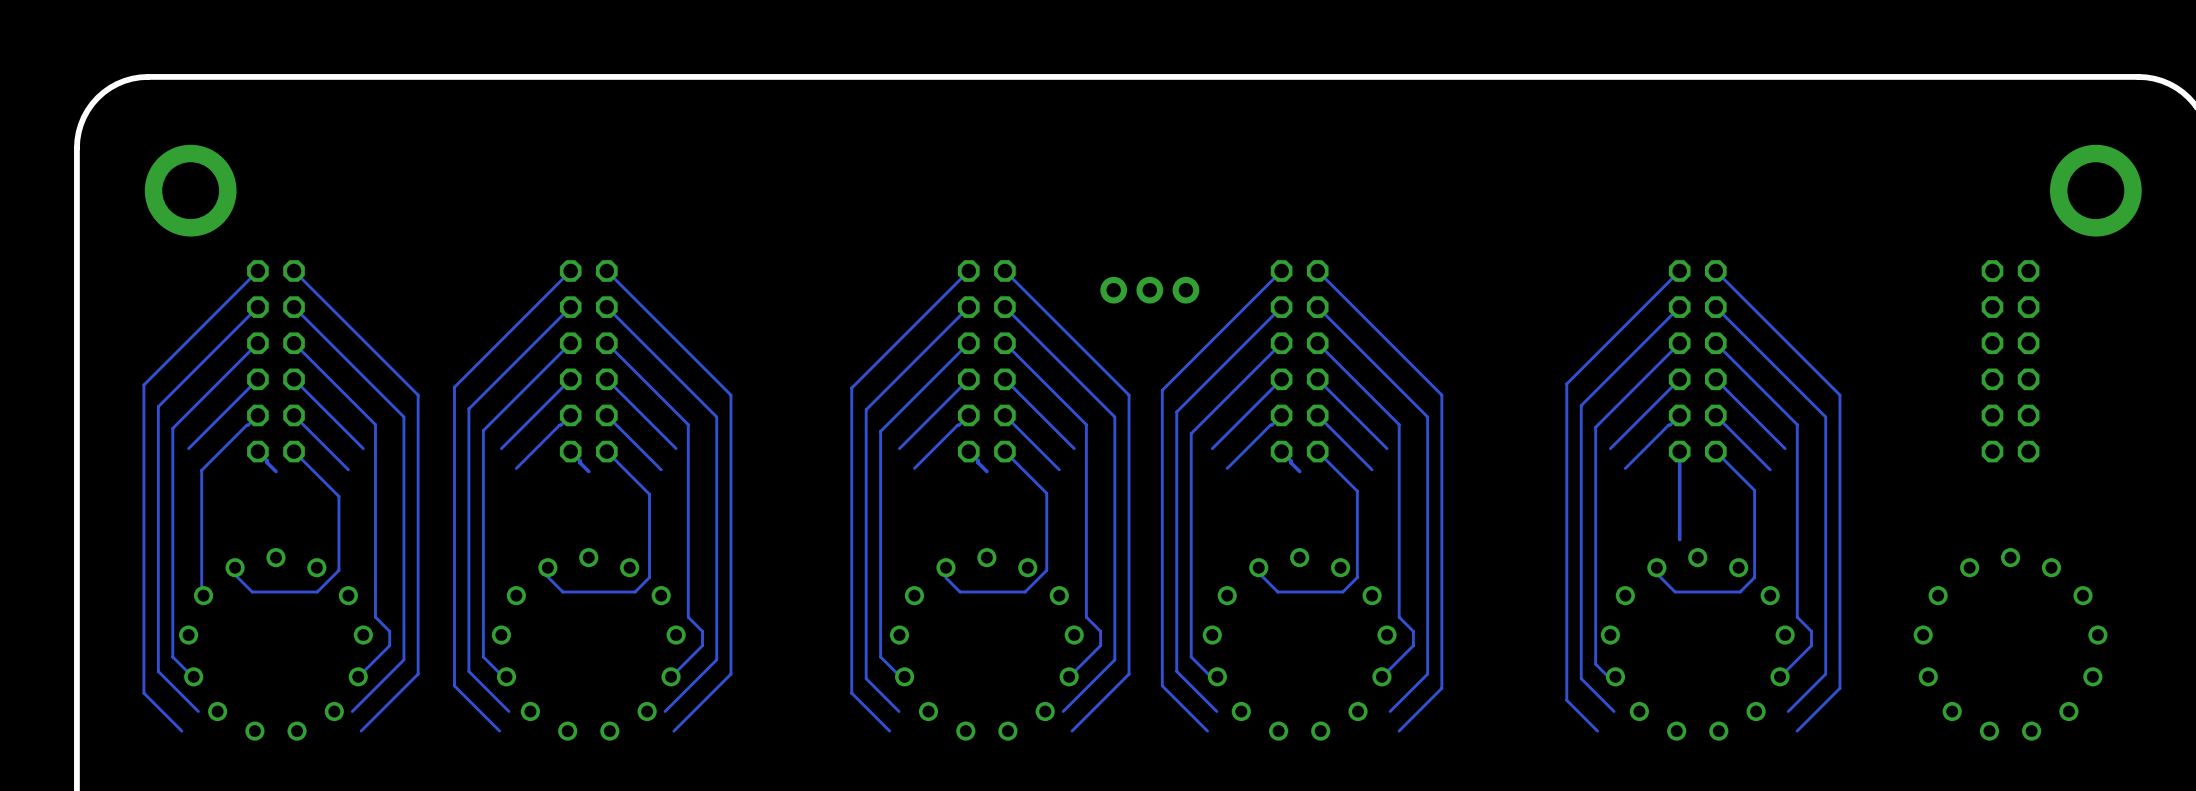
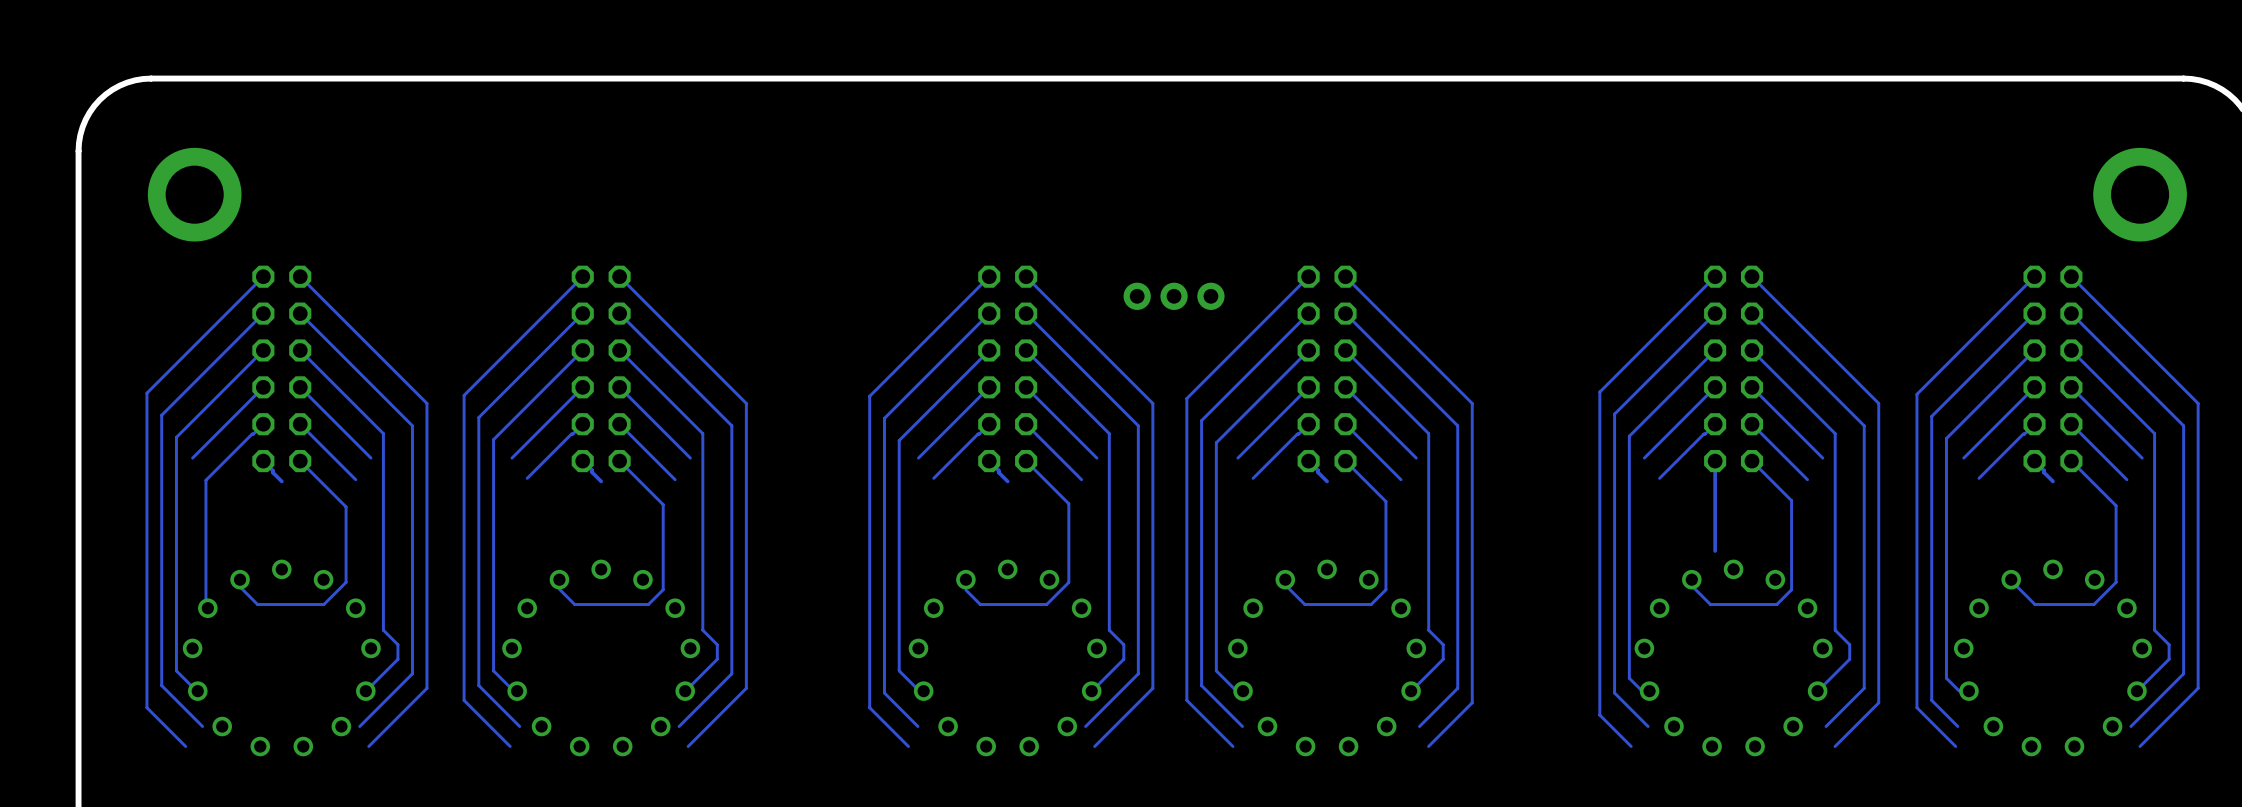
track: none -> (2034, 276) (1916, 394) (1916, 707) (1955, 746)
track: none -> (2071, 276) (2198, 403) (2198, 688) (2139, 746)
track: none -> (2034, 313) (1931, 416) (1931, 700) (1957, 726)
track: none -> (2071, 313) (2183, 425) (2183, 673) (2130, 726)
track: none -> (2034, 350) (1946, 438) (1946, 678) (1959, 691)
track: none -> (2071, 350) (2154, 433) (2154, 630) (2169, 644) (2169, 659) (2137, 691)
track: none -> (2034, 387) (1963, 458)
track: none -> (2071, 387) (2142, 458)
track: none -> (2034, 424) (1979, 478)
track: none -> (2071, 424) (2126, 479)
track: none -> (2034, 461) (2052, 481)
track: none -> (2071, 461) (2116, 505) (2116, 582) (2093, 604) (2034, 604) (2011, 580)

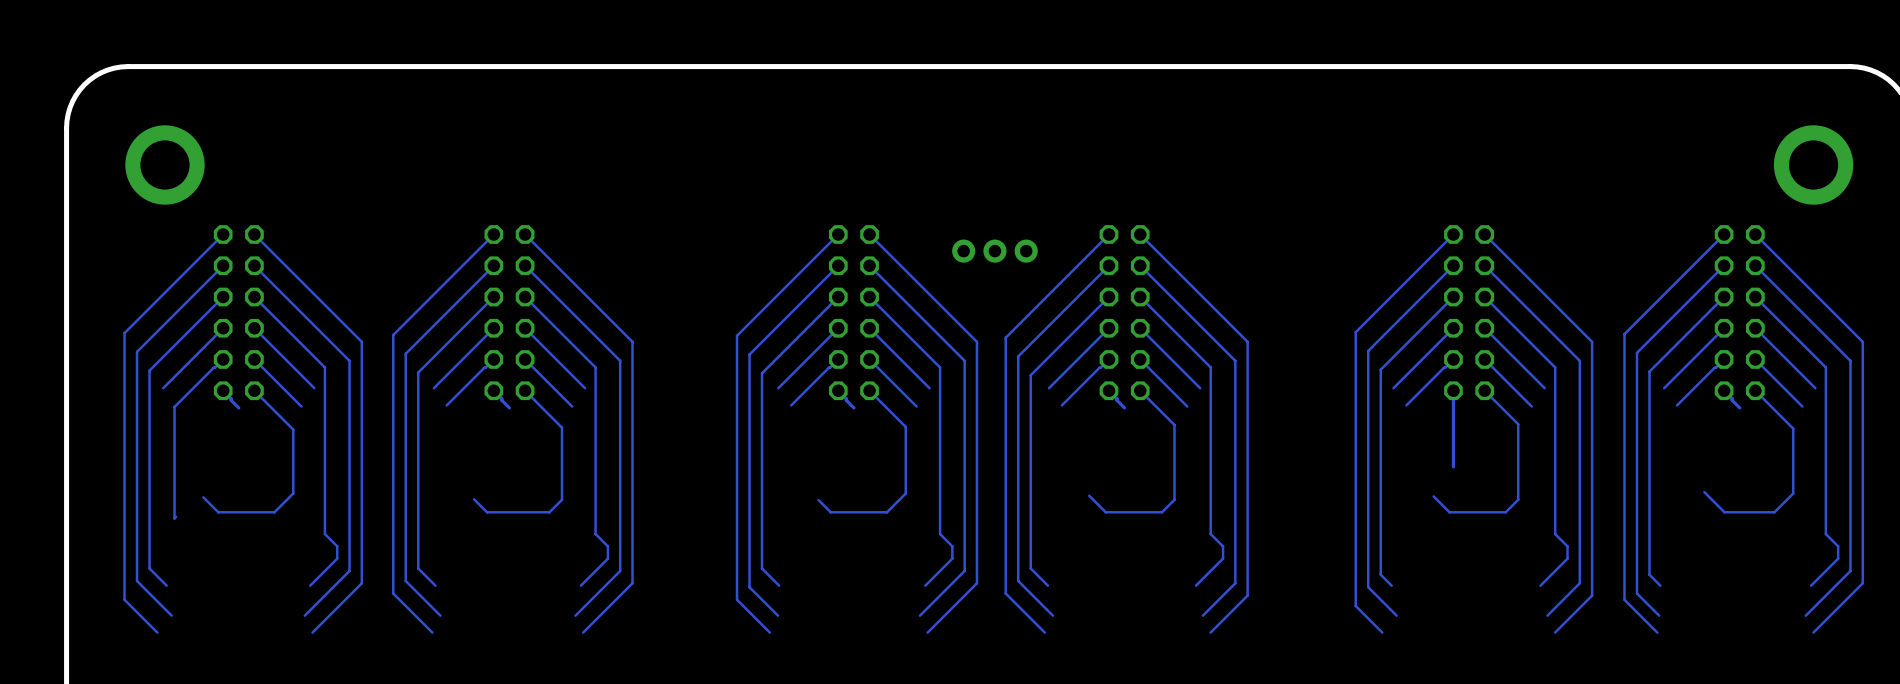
part: (281, 657) -> none
part: (601, 657) -> none
part: (1007, 657) -> none
part: (1327, 657) -> none
part: (1733, 657) -> none
part: (2052, 657) -> none

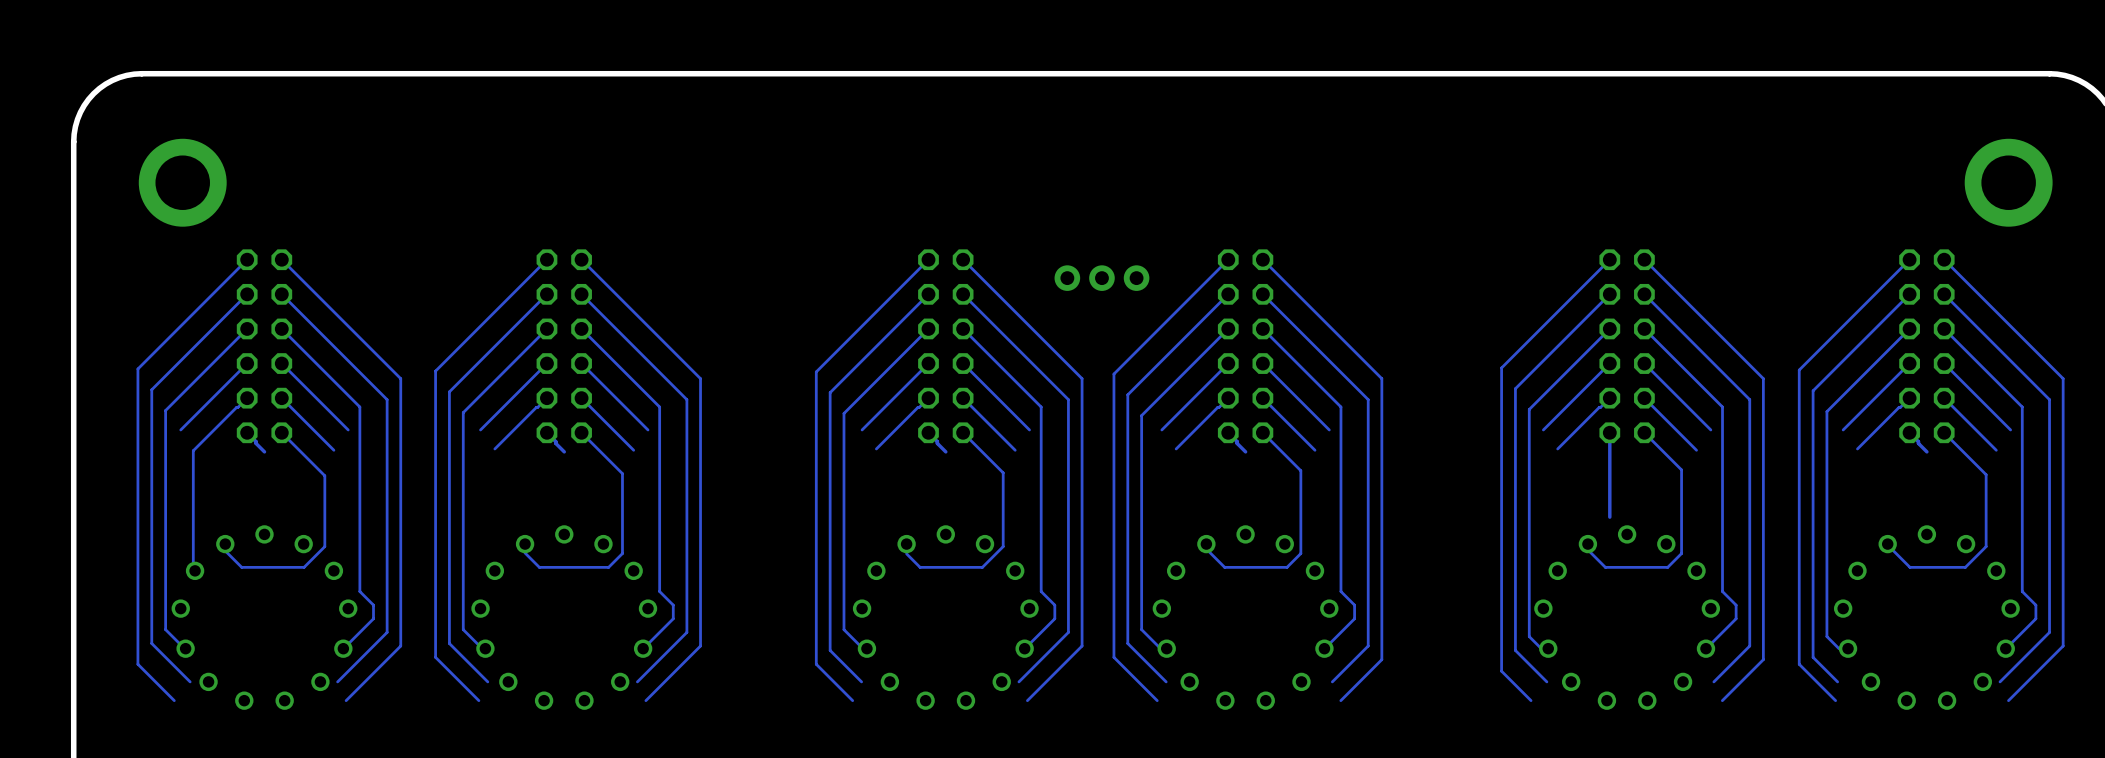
part: none -> (264, 617)
part: none -> (564, 617)
part: none -> (945, 617)
part: none -> (1245, 617)
part: none -> (1627, 617)
part: none -> (1926, 617)

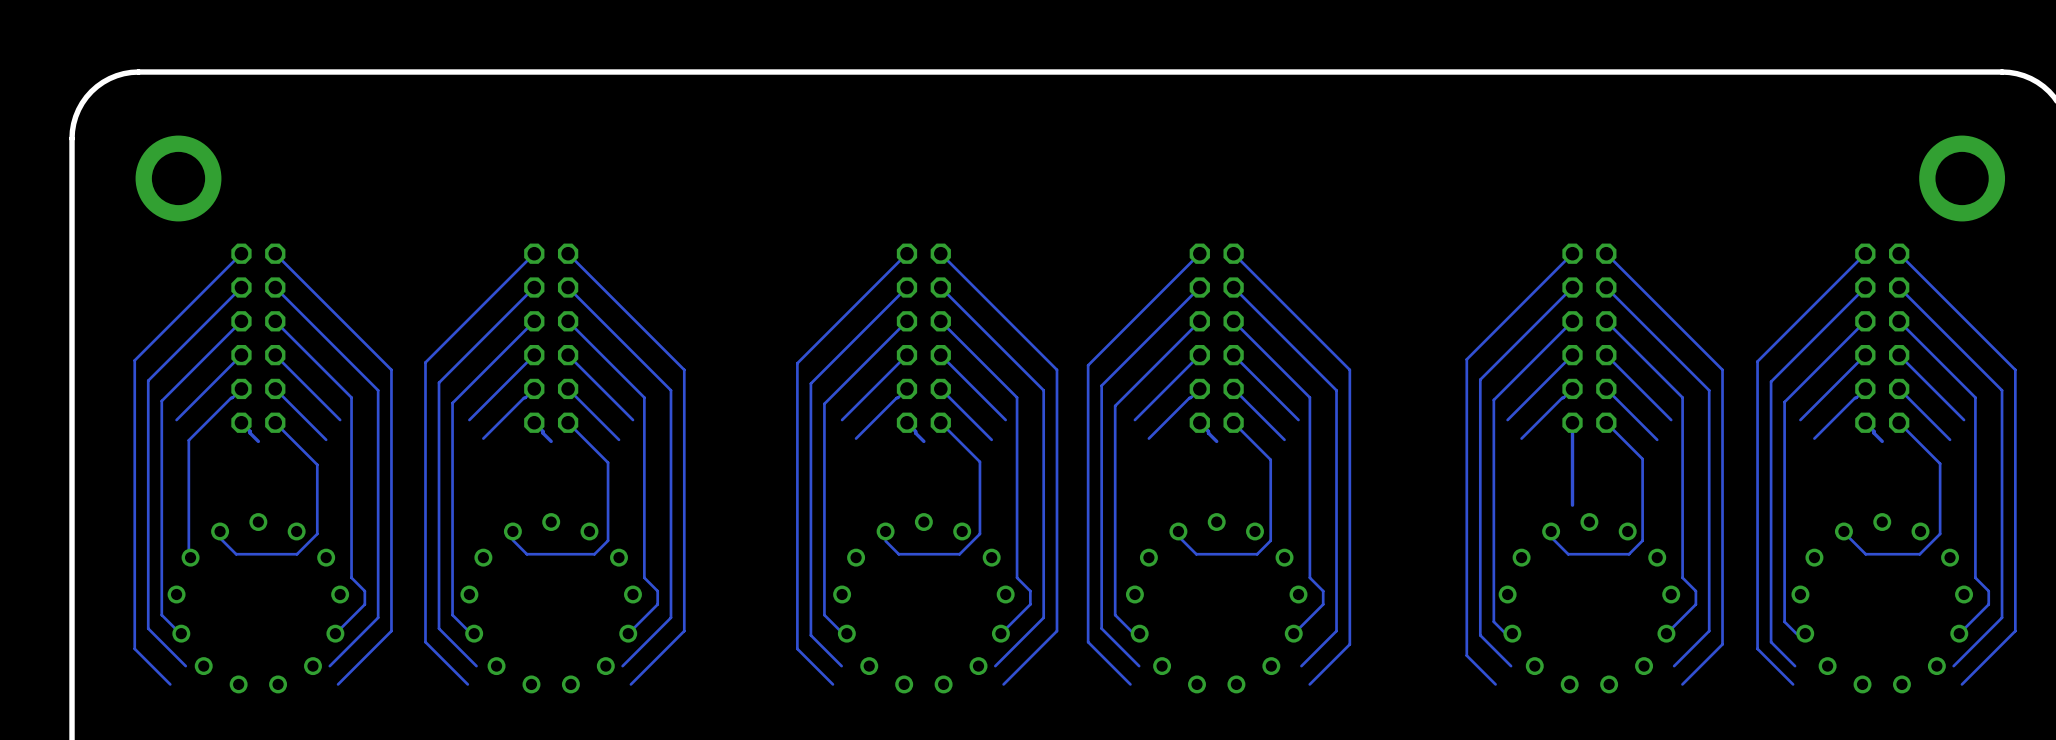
part: (1101, 278) -> none

